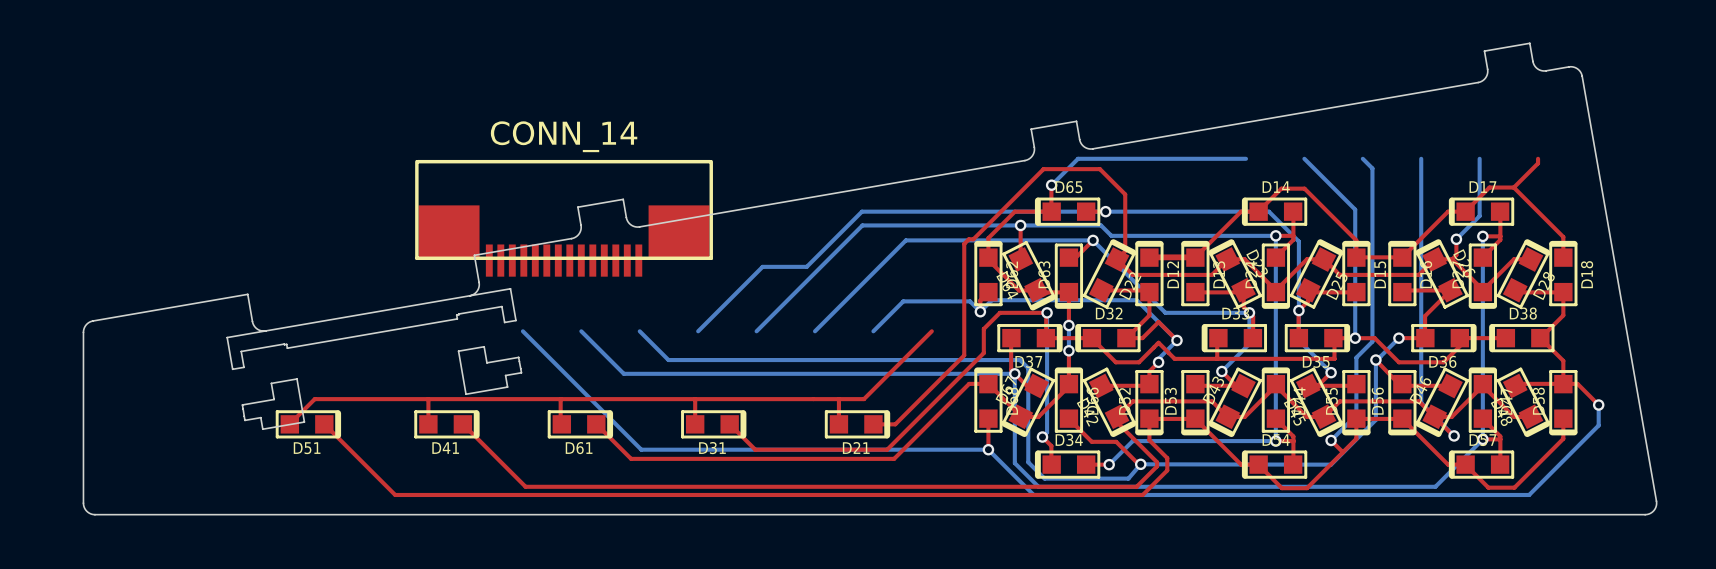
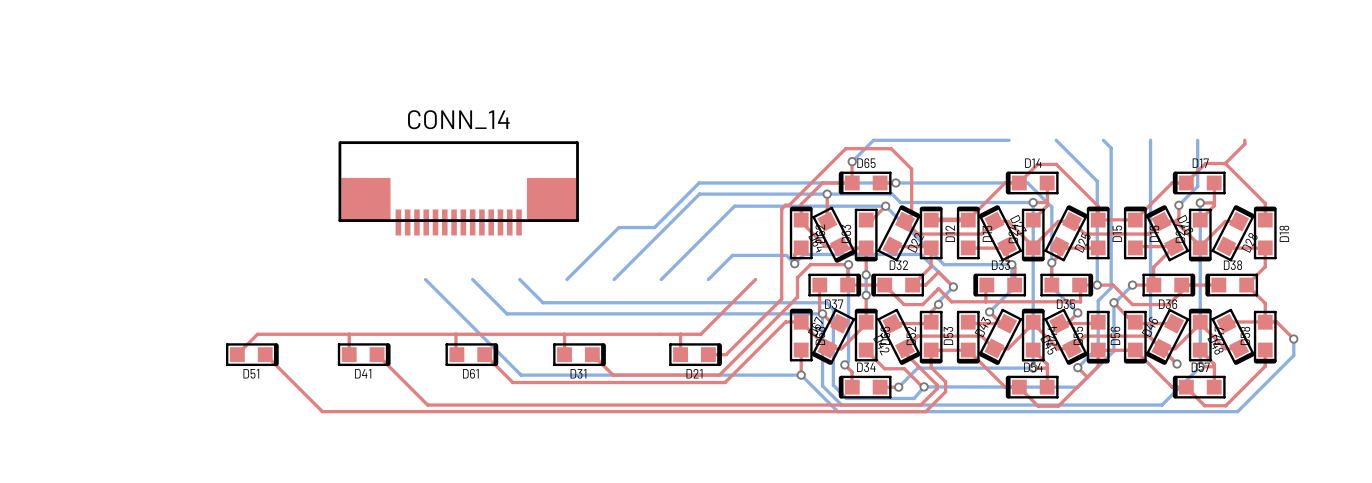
board edge: (510, 288) (227, 337) (232, 369) (243, 367) (241, 351) (284, 344) (286, 344) (287, 348) (457, 318) (456, 315) (458, 314) (501, 306) (504, 322) (515, 320) (510, 288) -> none
board edge: (469, 295) (476, 292) (479, 286) (474, 255) (574, 237) (581, 229) (577, 207) (623, 199) (627, 221) (632, 225) (639, 226) (1026, 160) (1032, 155) (1034, 150) (1031, 129) (1076, 121) (1080, 143) (1086, 148) (1092, 148) (1479, 82) (1485, 77) (1487, 72) (1484, 51) (1529, 43) (1533, 62) (1538, 69) (1544, 70) (1571, 66) (1577, 68) (1581, 74) (1656, 505) (1652, 511) (1645, 514) (94, 514) (86, 511) (83, 503) (83, 332) (87, 323) (93, 321) (247, 294) (253, 325) (259, 330) (265, 330) -> none
board edge: (484, 346) (458, 351) (465, 394) (507, 387) (505, 375) (521, 372) (518, 357) (486, 362) (484, 346) -> none
board edge: (297, 378) (271, 383) (274, 399) (242, 404) (244, 420) (260, 417) (262, 429) (304, 422) (297, 378) -> none

